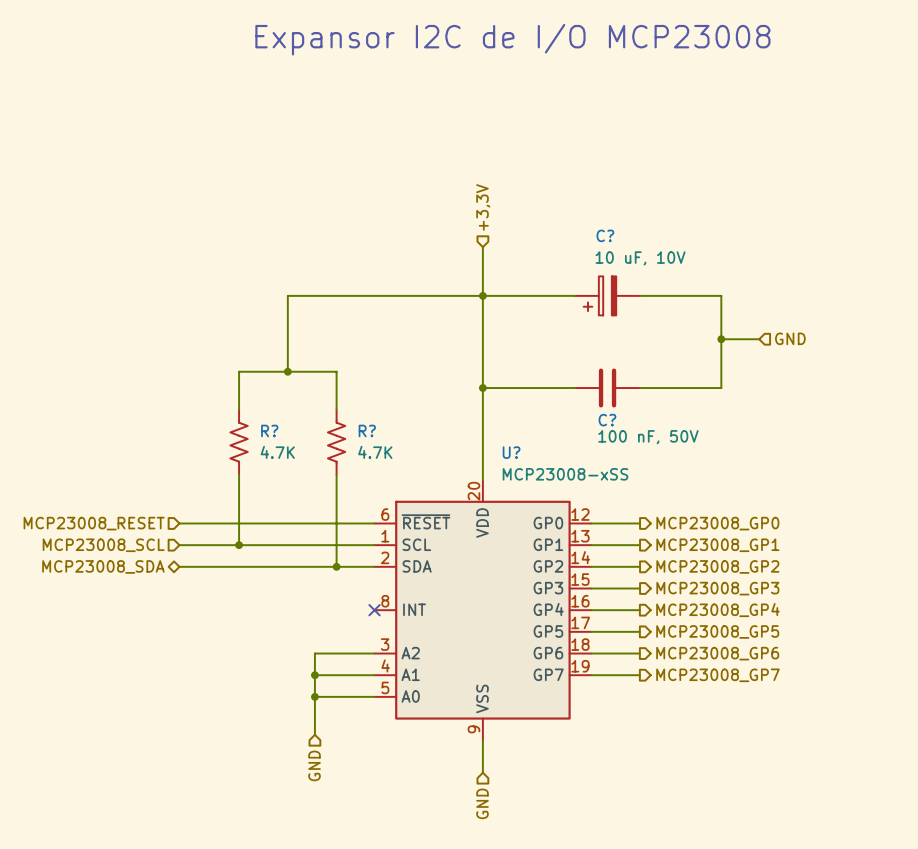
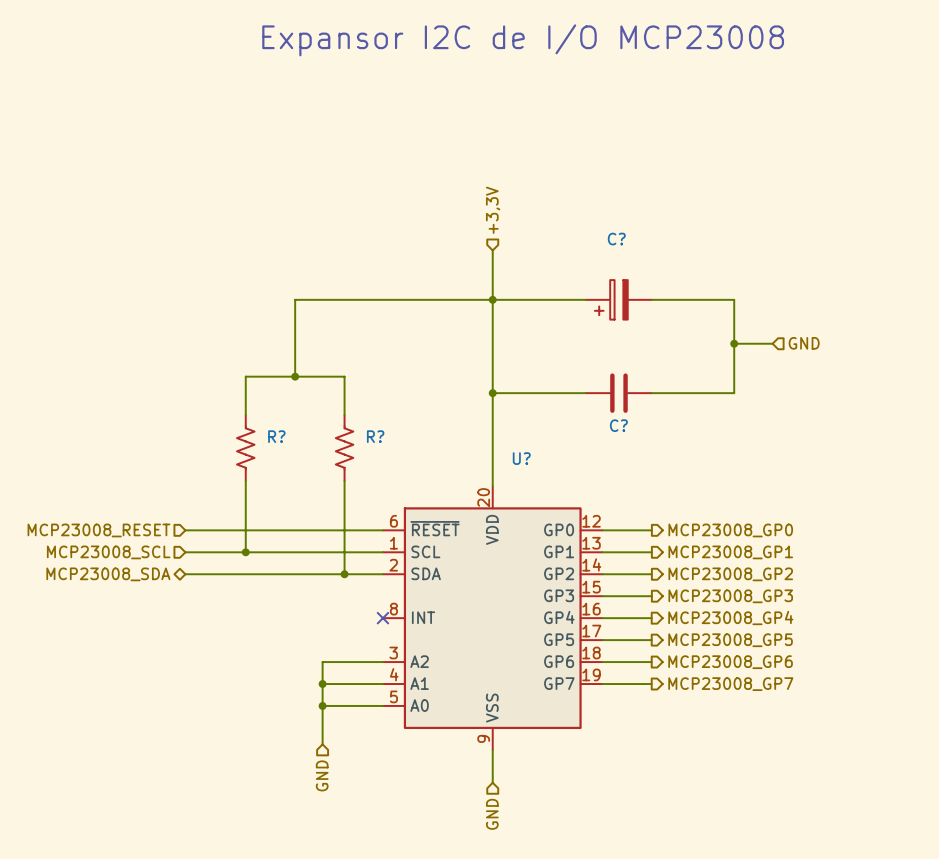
C? value: 10 uF, 10V (640, 258) -> none
C? value: 100 nF, 50V (648, 437) -> none
R? value: 4.7K (277, 452) -> none
R? value: 4.7K (375, 452) -> none
U? value: MCP23008-xSS (565, 474) -> none

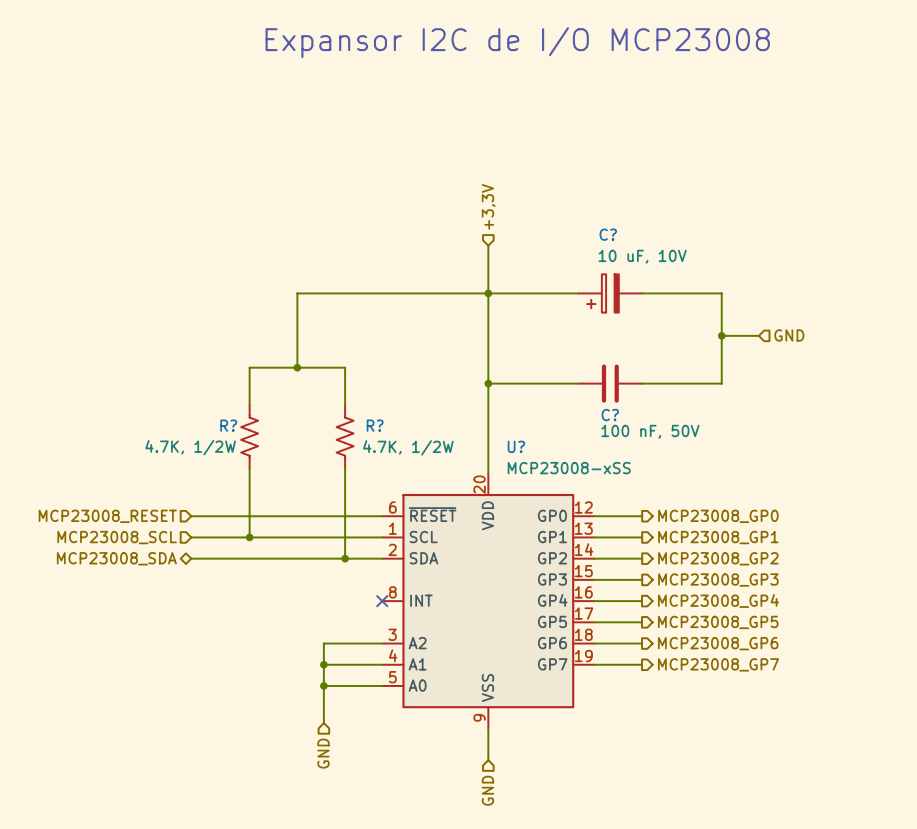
C? value: none -> 10 uF, 10V (642, 256)
R? name position: R? (276, 436) -> R? (228, 425)
C? value: none -> 100 nF, 50V (650, 431)
R? value: none -> 4.7K, 1/2W (190, 447)
R? value: none -> 4.7K, 1/2W (408, 447)
U? value: none -> MCP23008-xSS (569, 468)

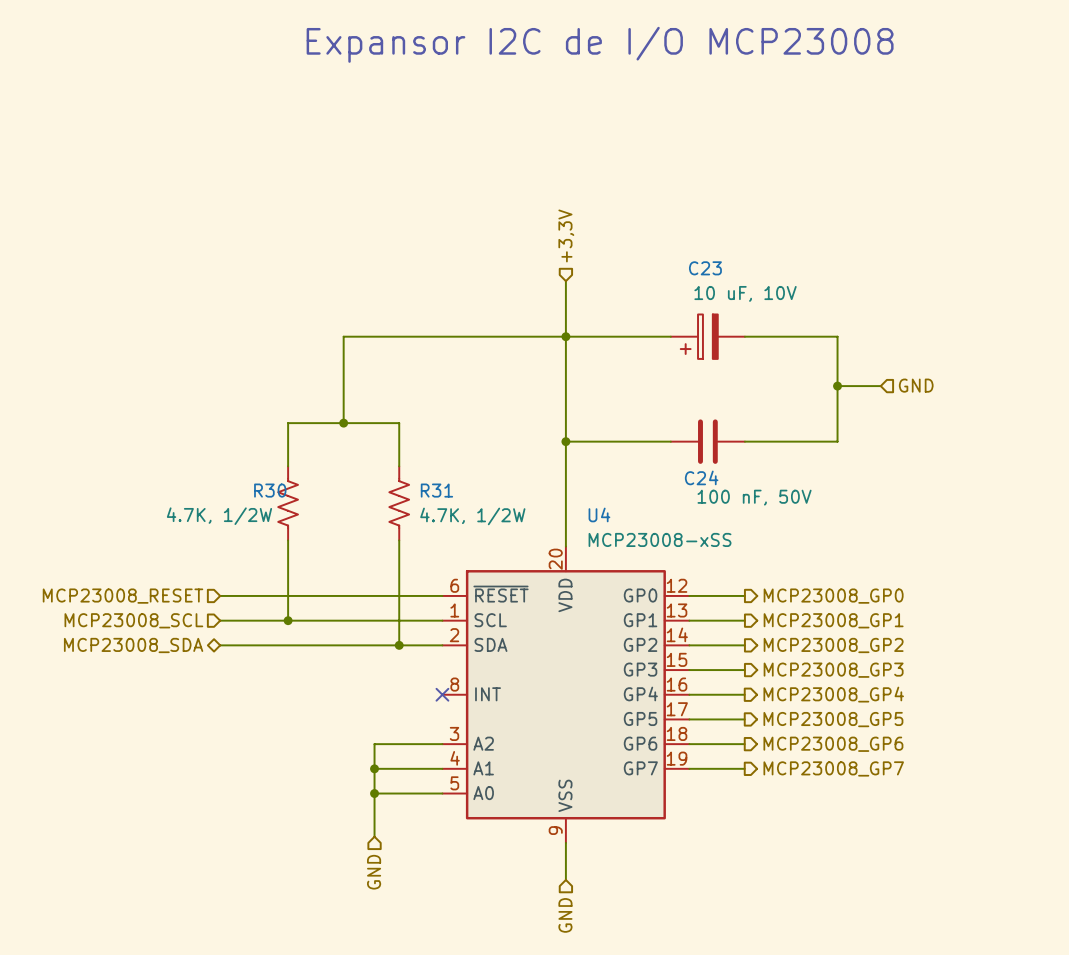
C? name: C? (608, 234) -> C23 (705, 268)
C? name: C? (610, 415) -> C24 (701, 477)
R? name: R? (228, 425) -> R30 (270, 490)
R? name: R? (375, 425) -> R31 (436, 490)
U? name: U? (516, 446) -> U4 (599, 514)

